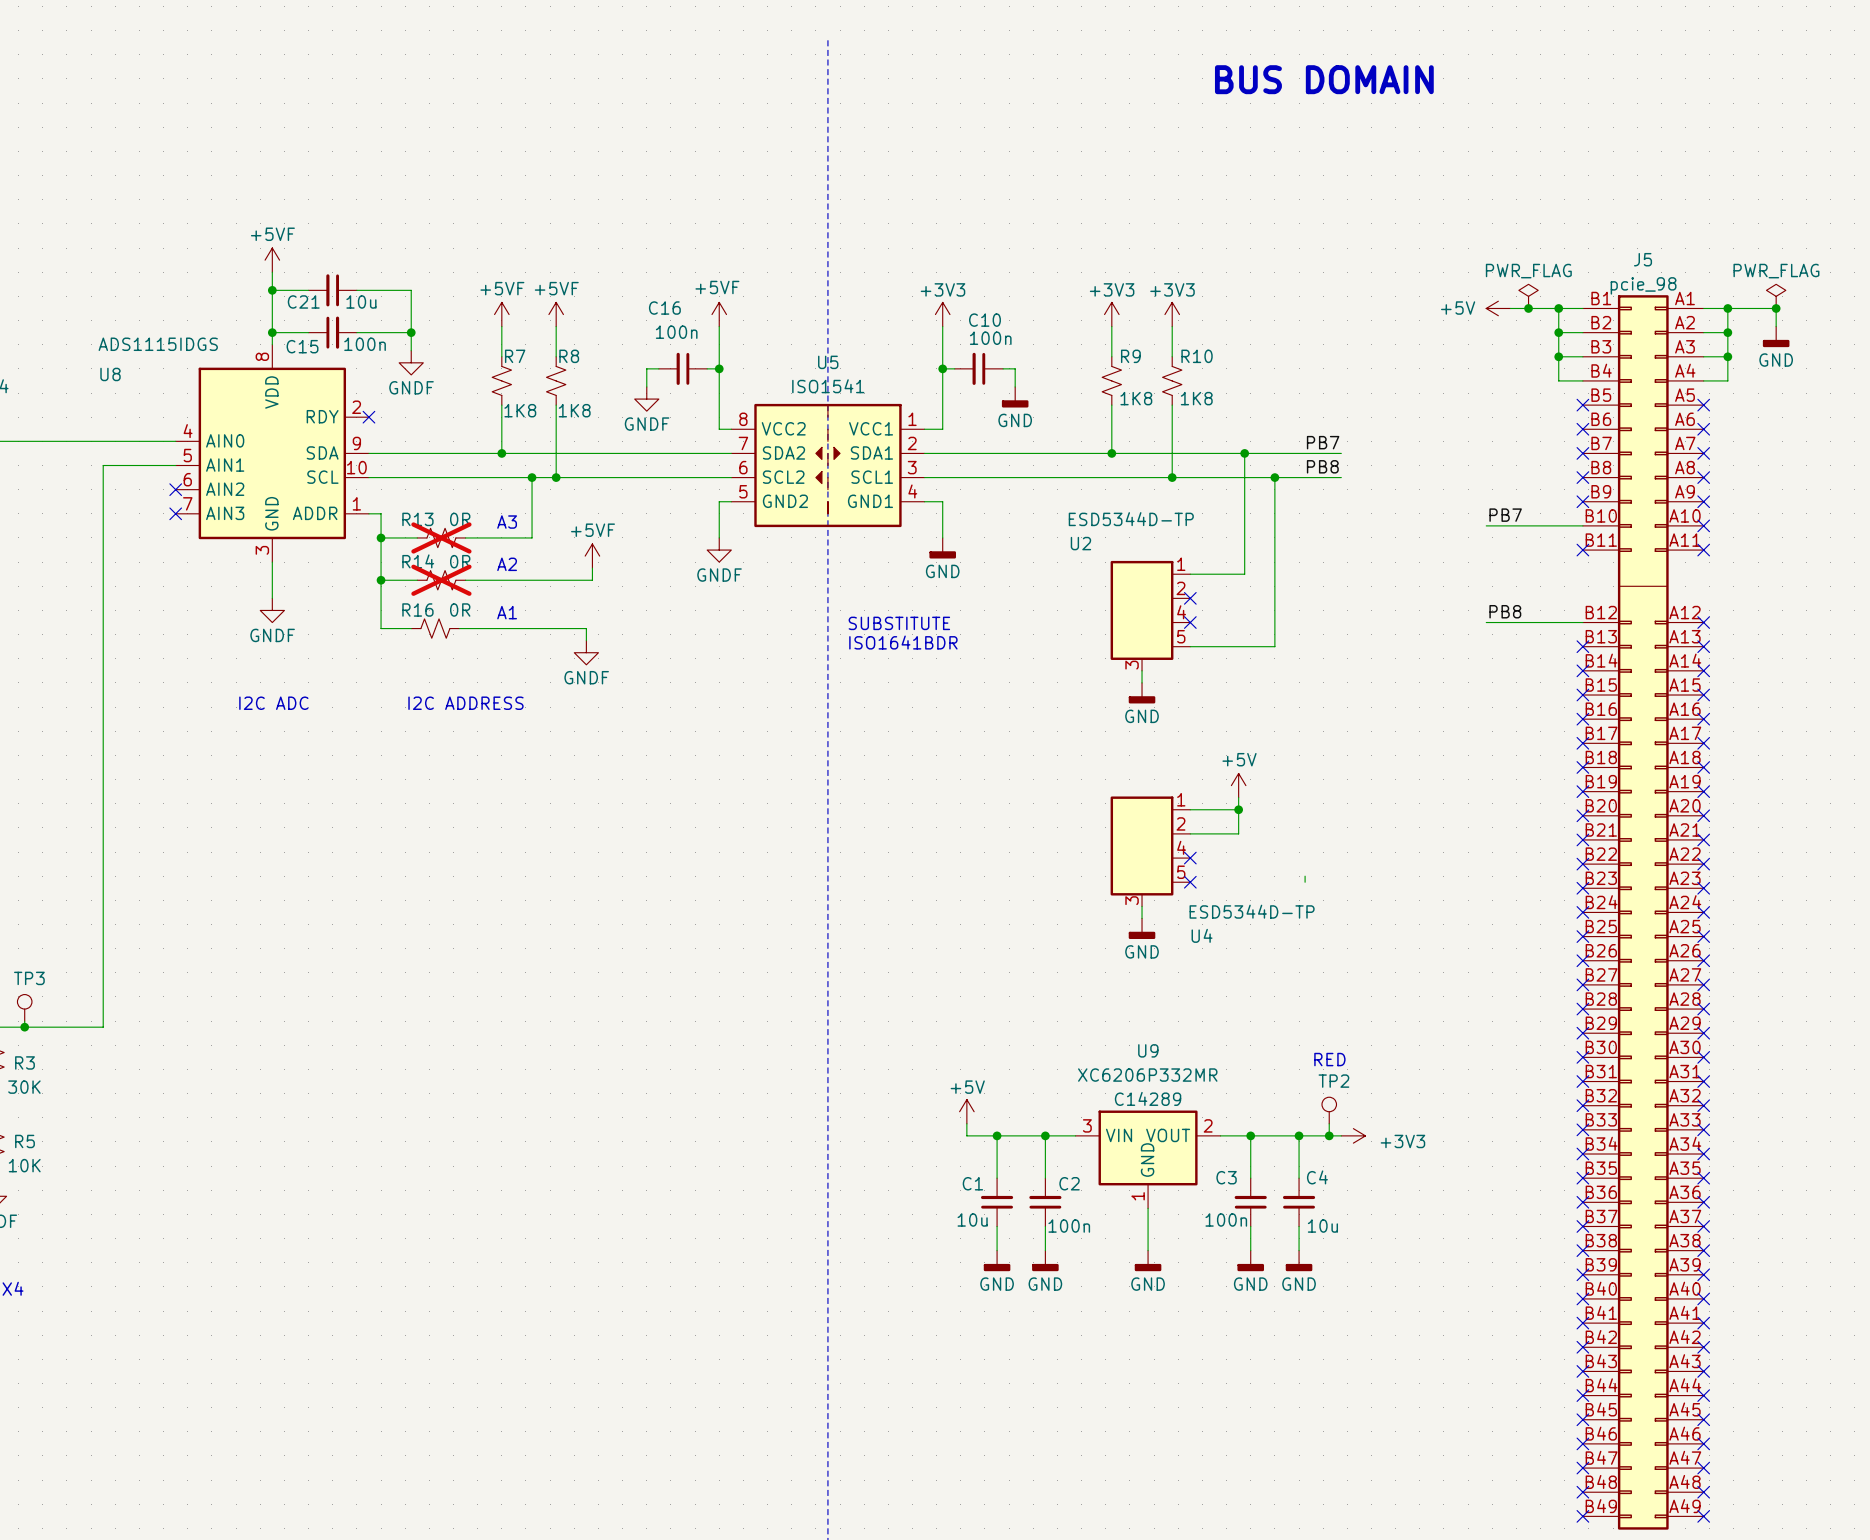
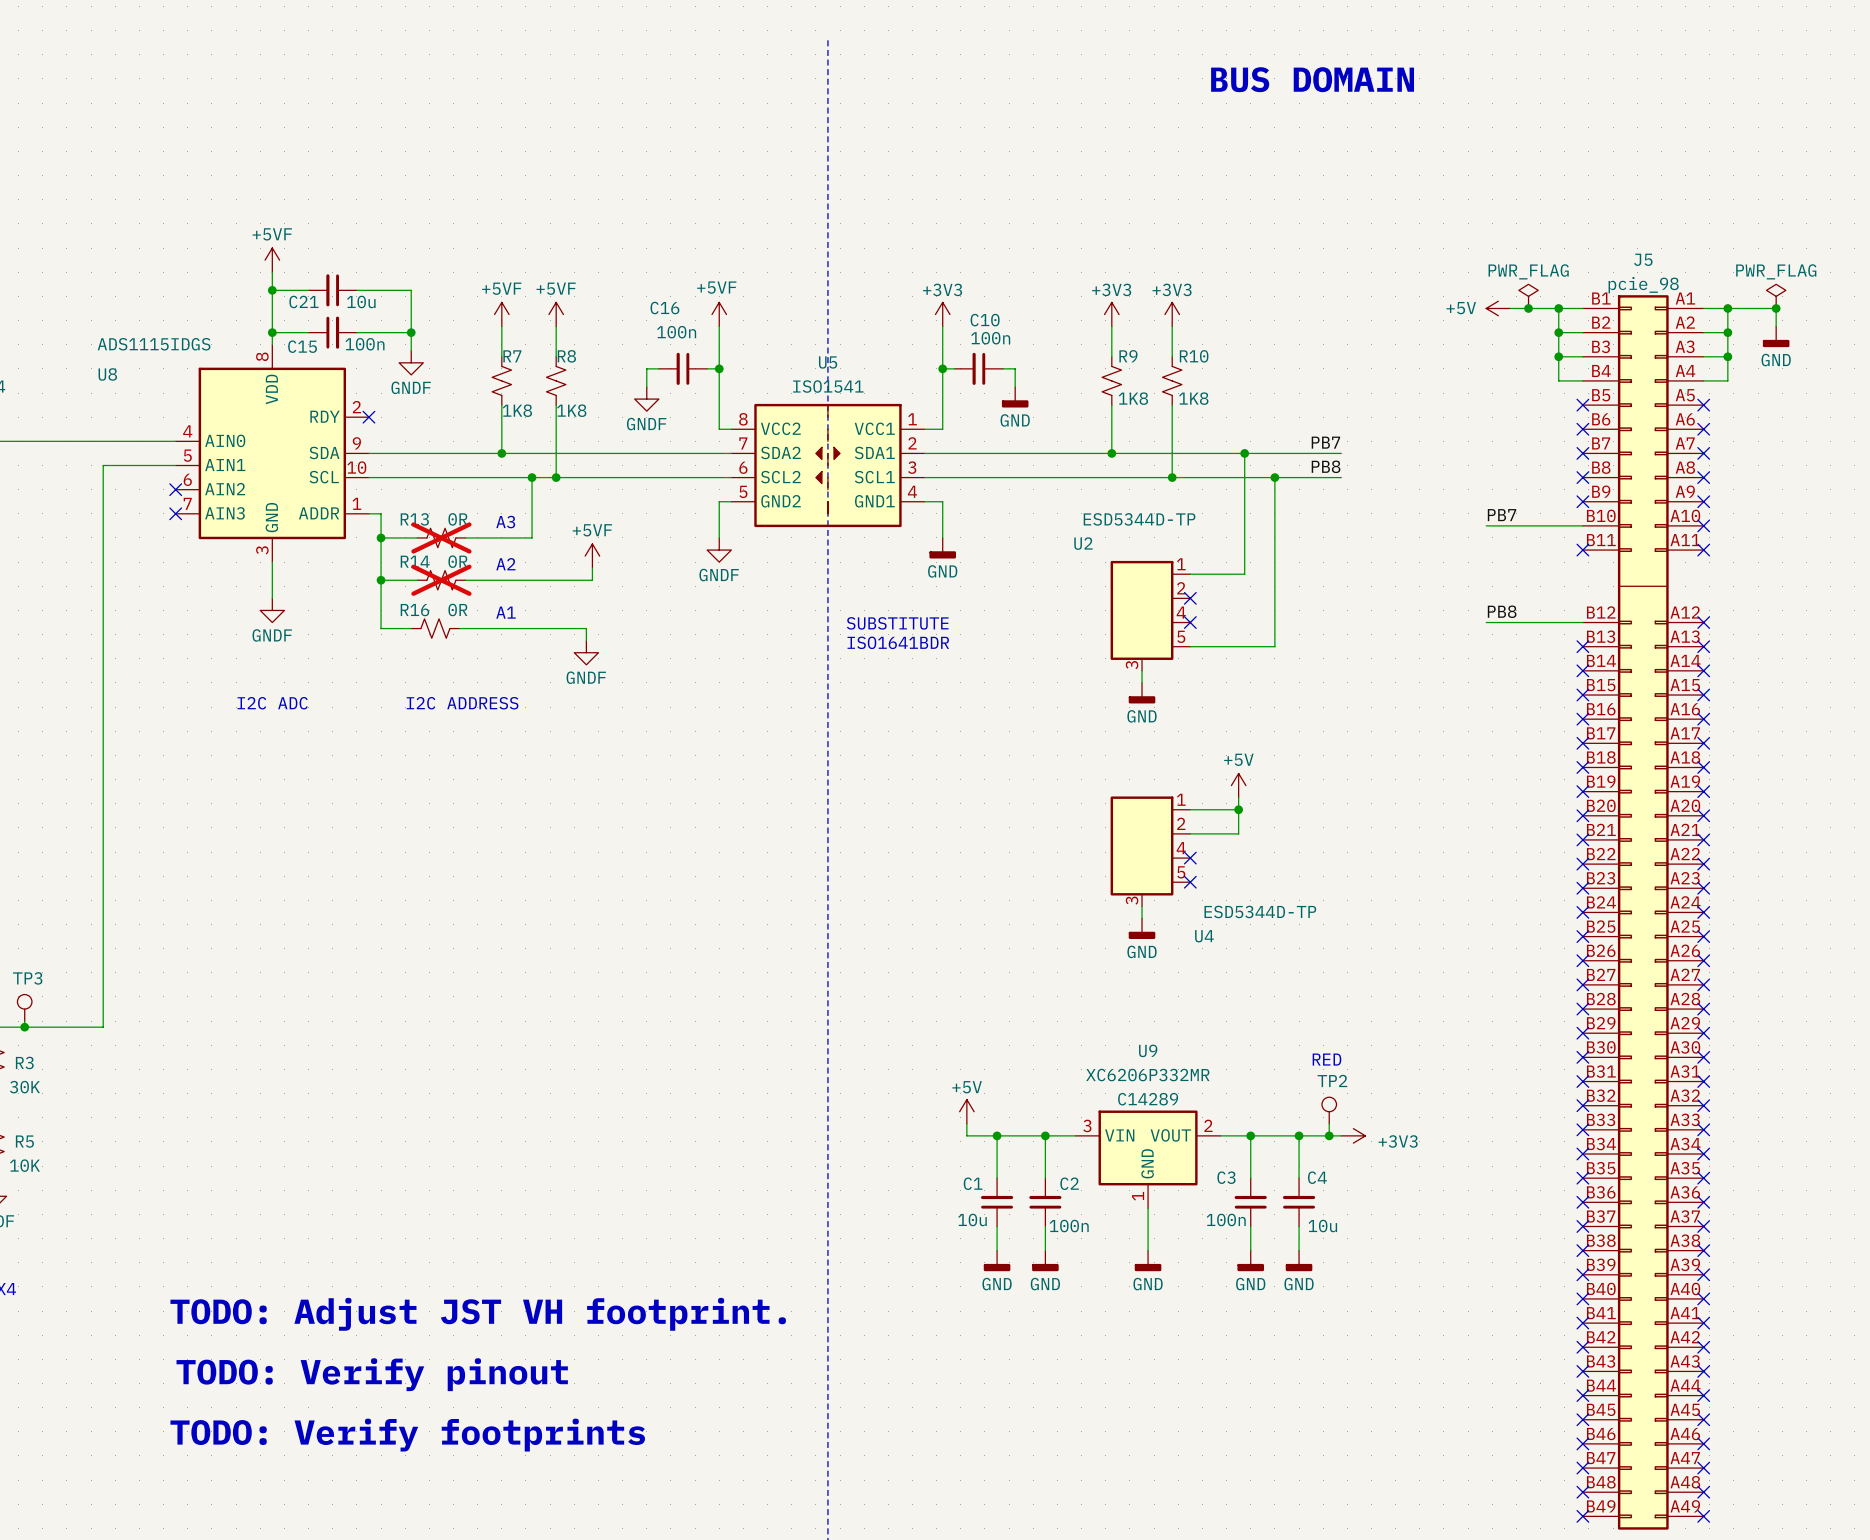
wire: (1305, 876) (1305, 882) -> none
text: none -> TODO: Adjust JST VH footprint. (478, 1314)
text: none -> TODO: Verify pinout (372, 1374)
text: none -> TODO: Verify footprints (407, 1435)

